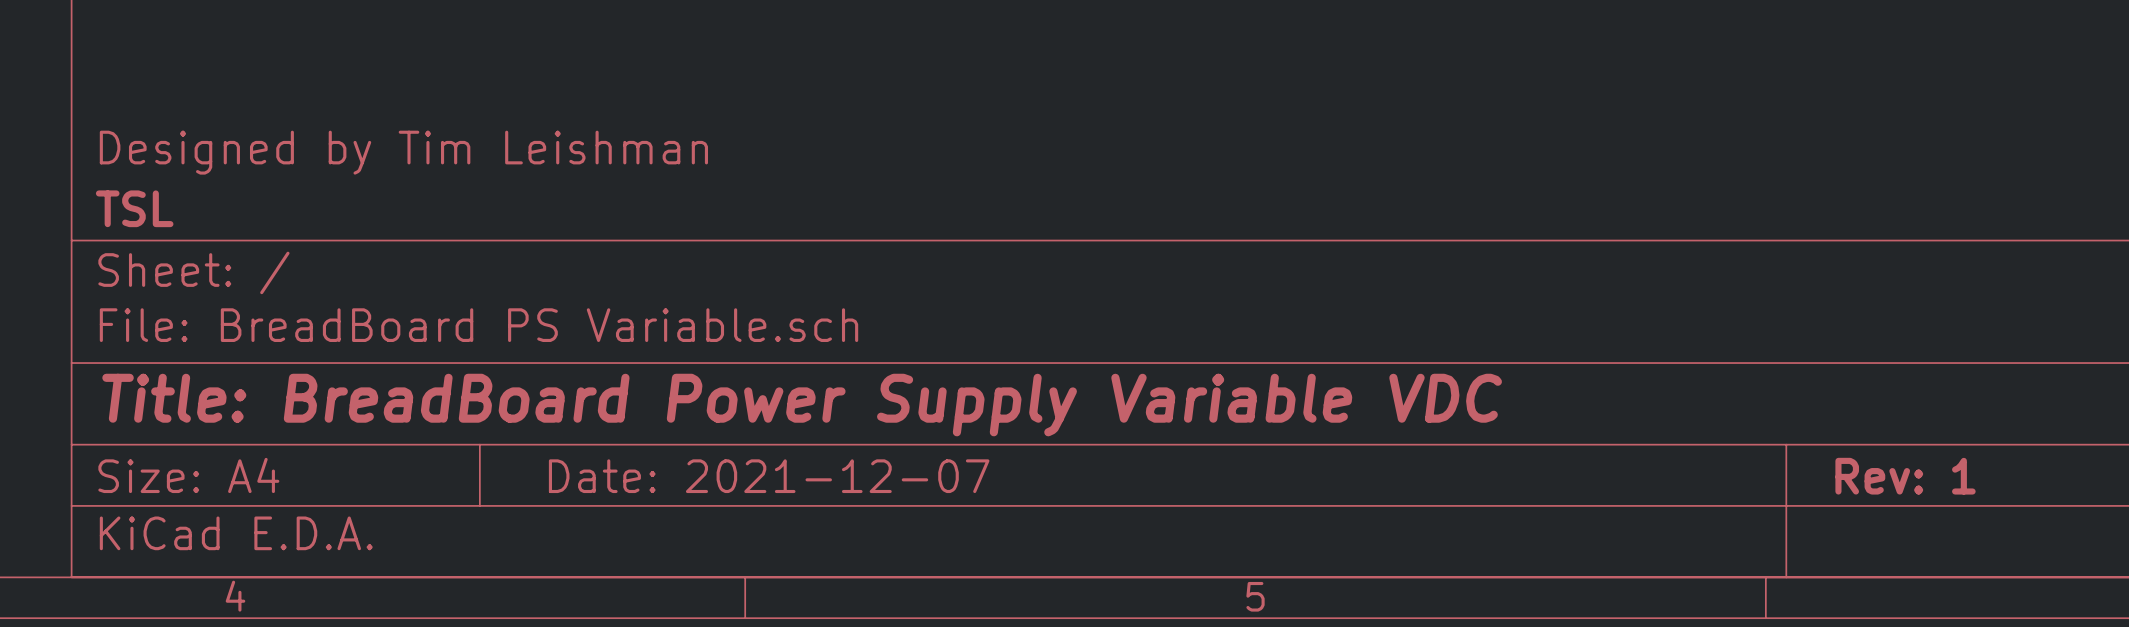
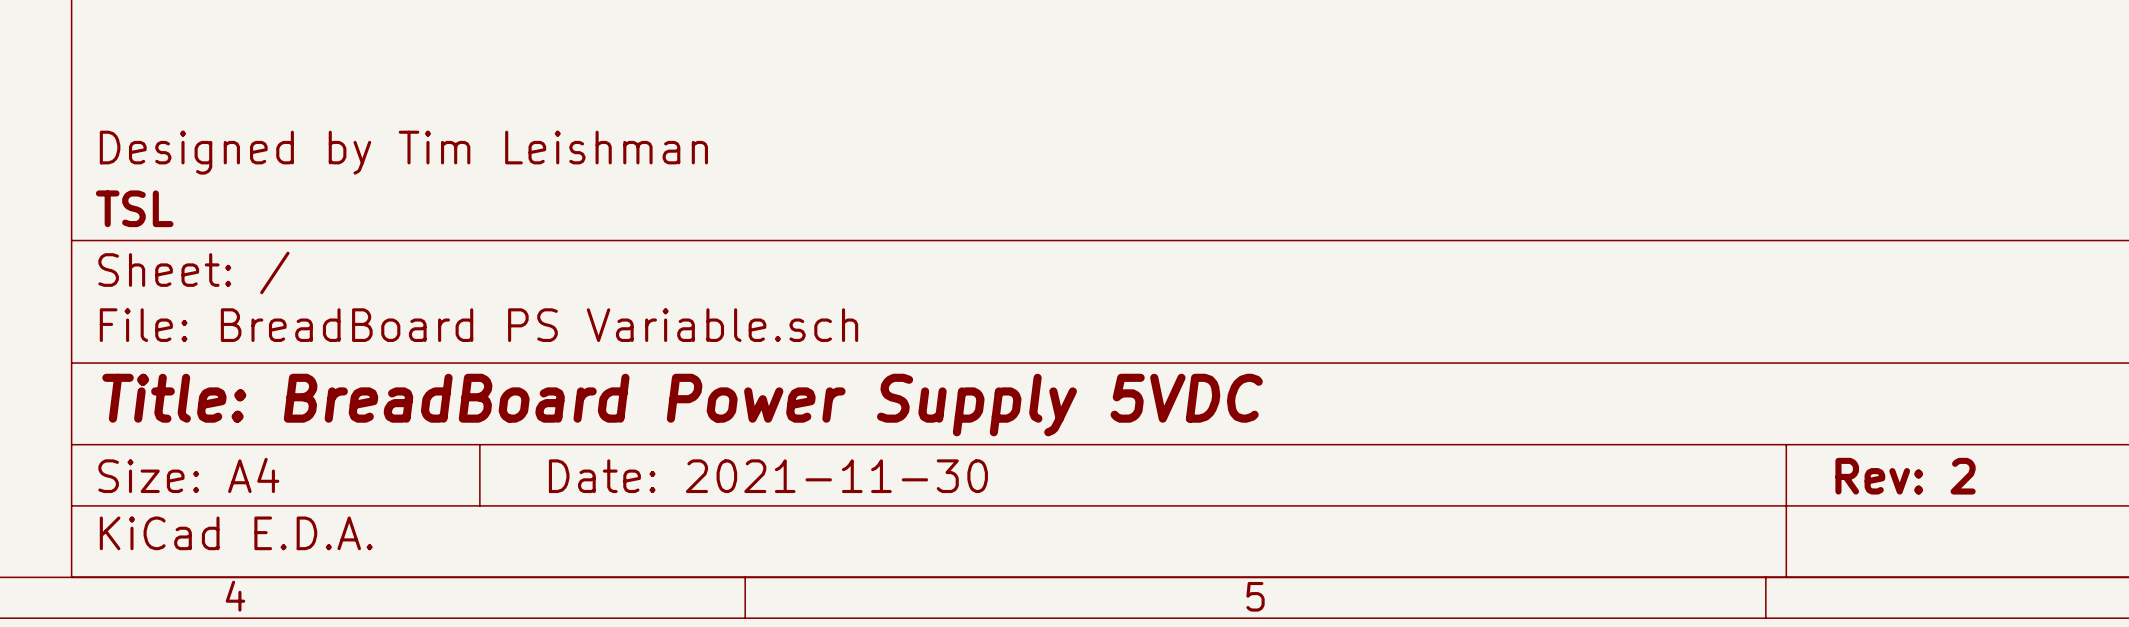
title block: Title: BreadBoard Power Supply Variable VDC (802, 405) -> Title: BreadBoard Power Supply 5VDC (682, 405)
title block: Date: 2021-12-07 (769, 476) -> Date: 2021-11-30 (768, 476)
title block: Rev: 1 (1905, 476) -> Rev: 2 (1905, 476)

